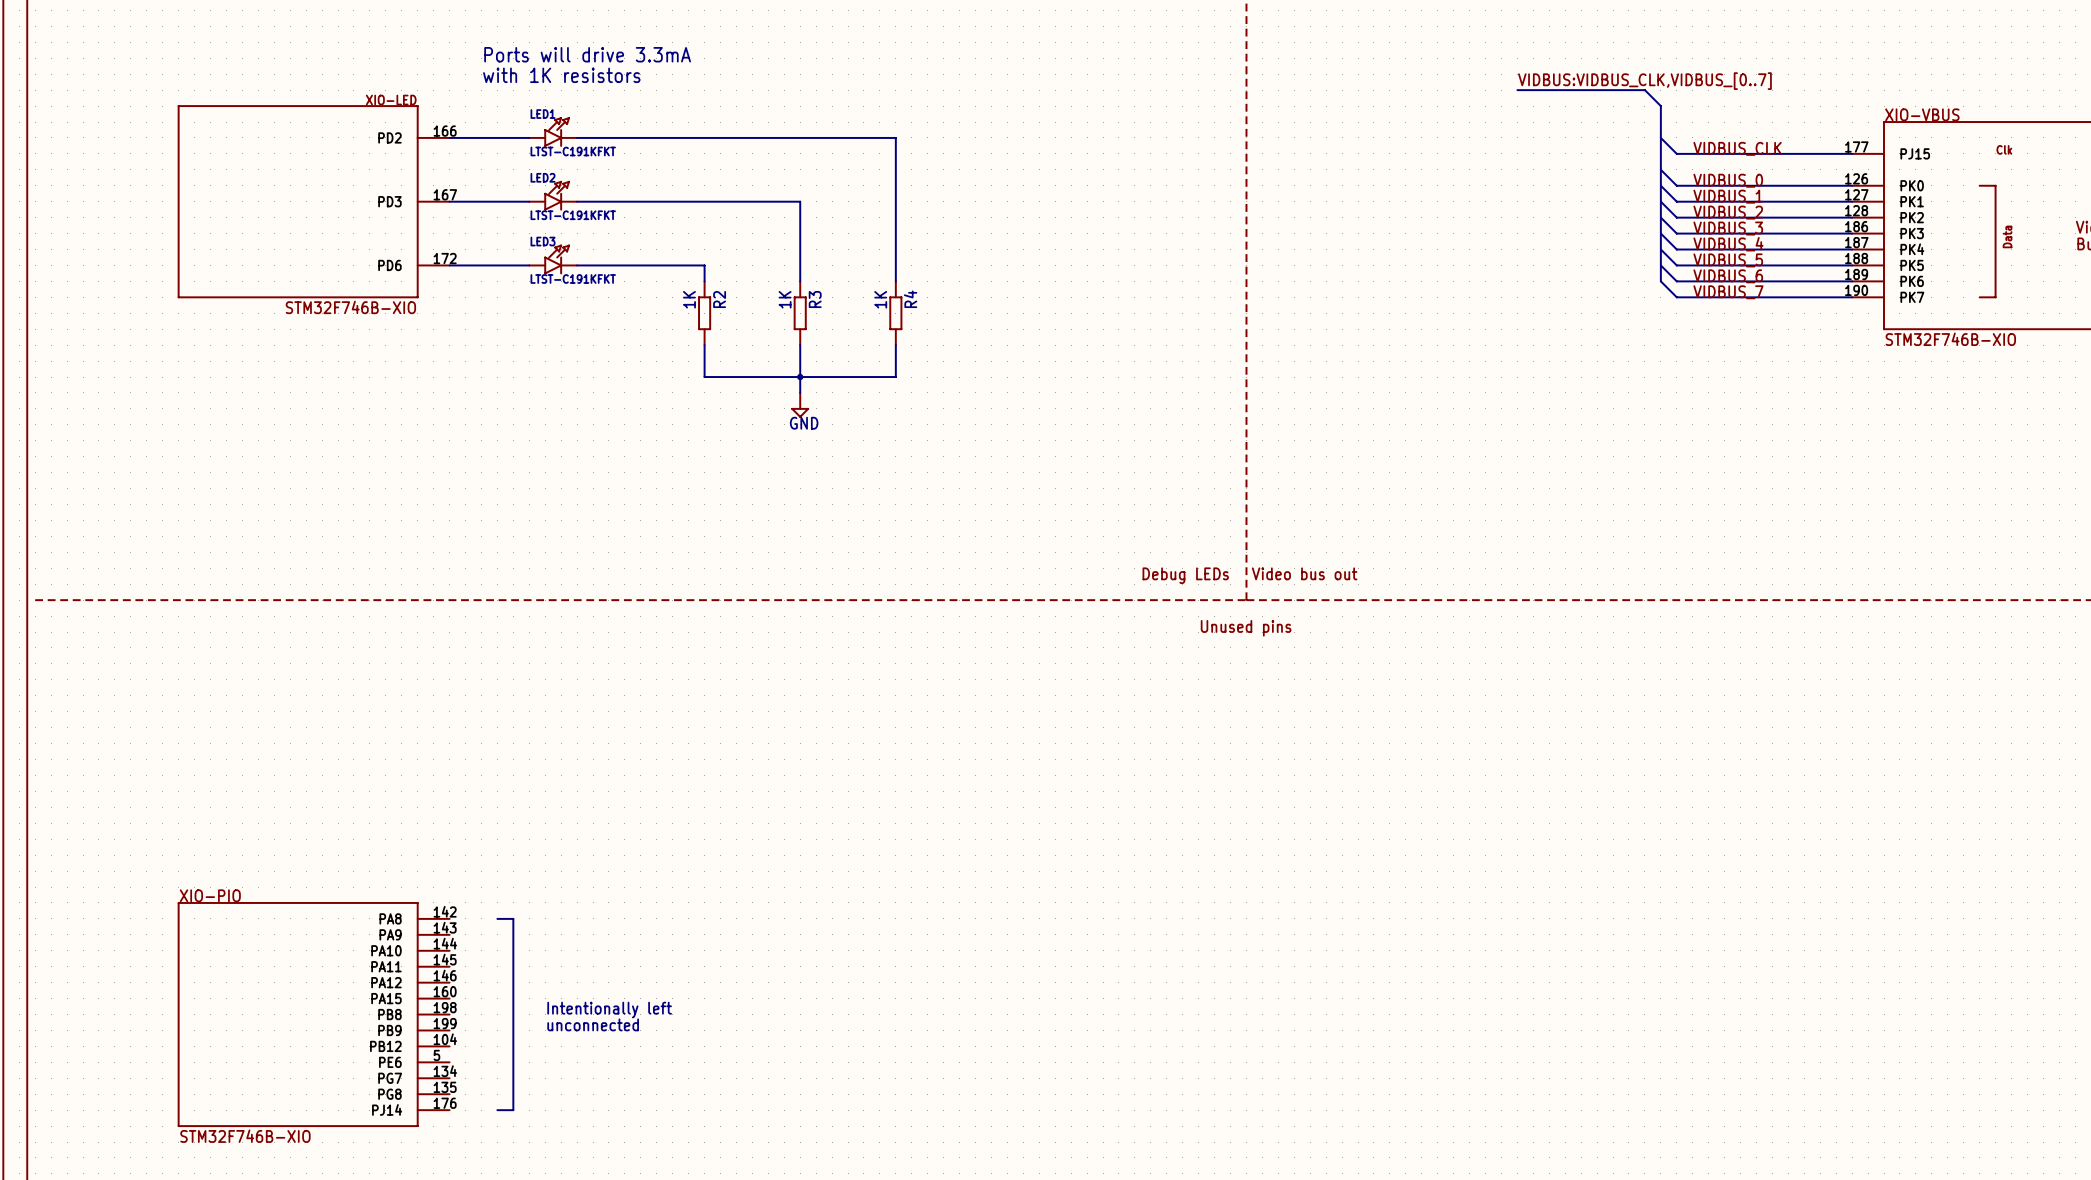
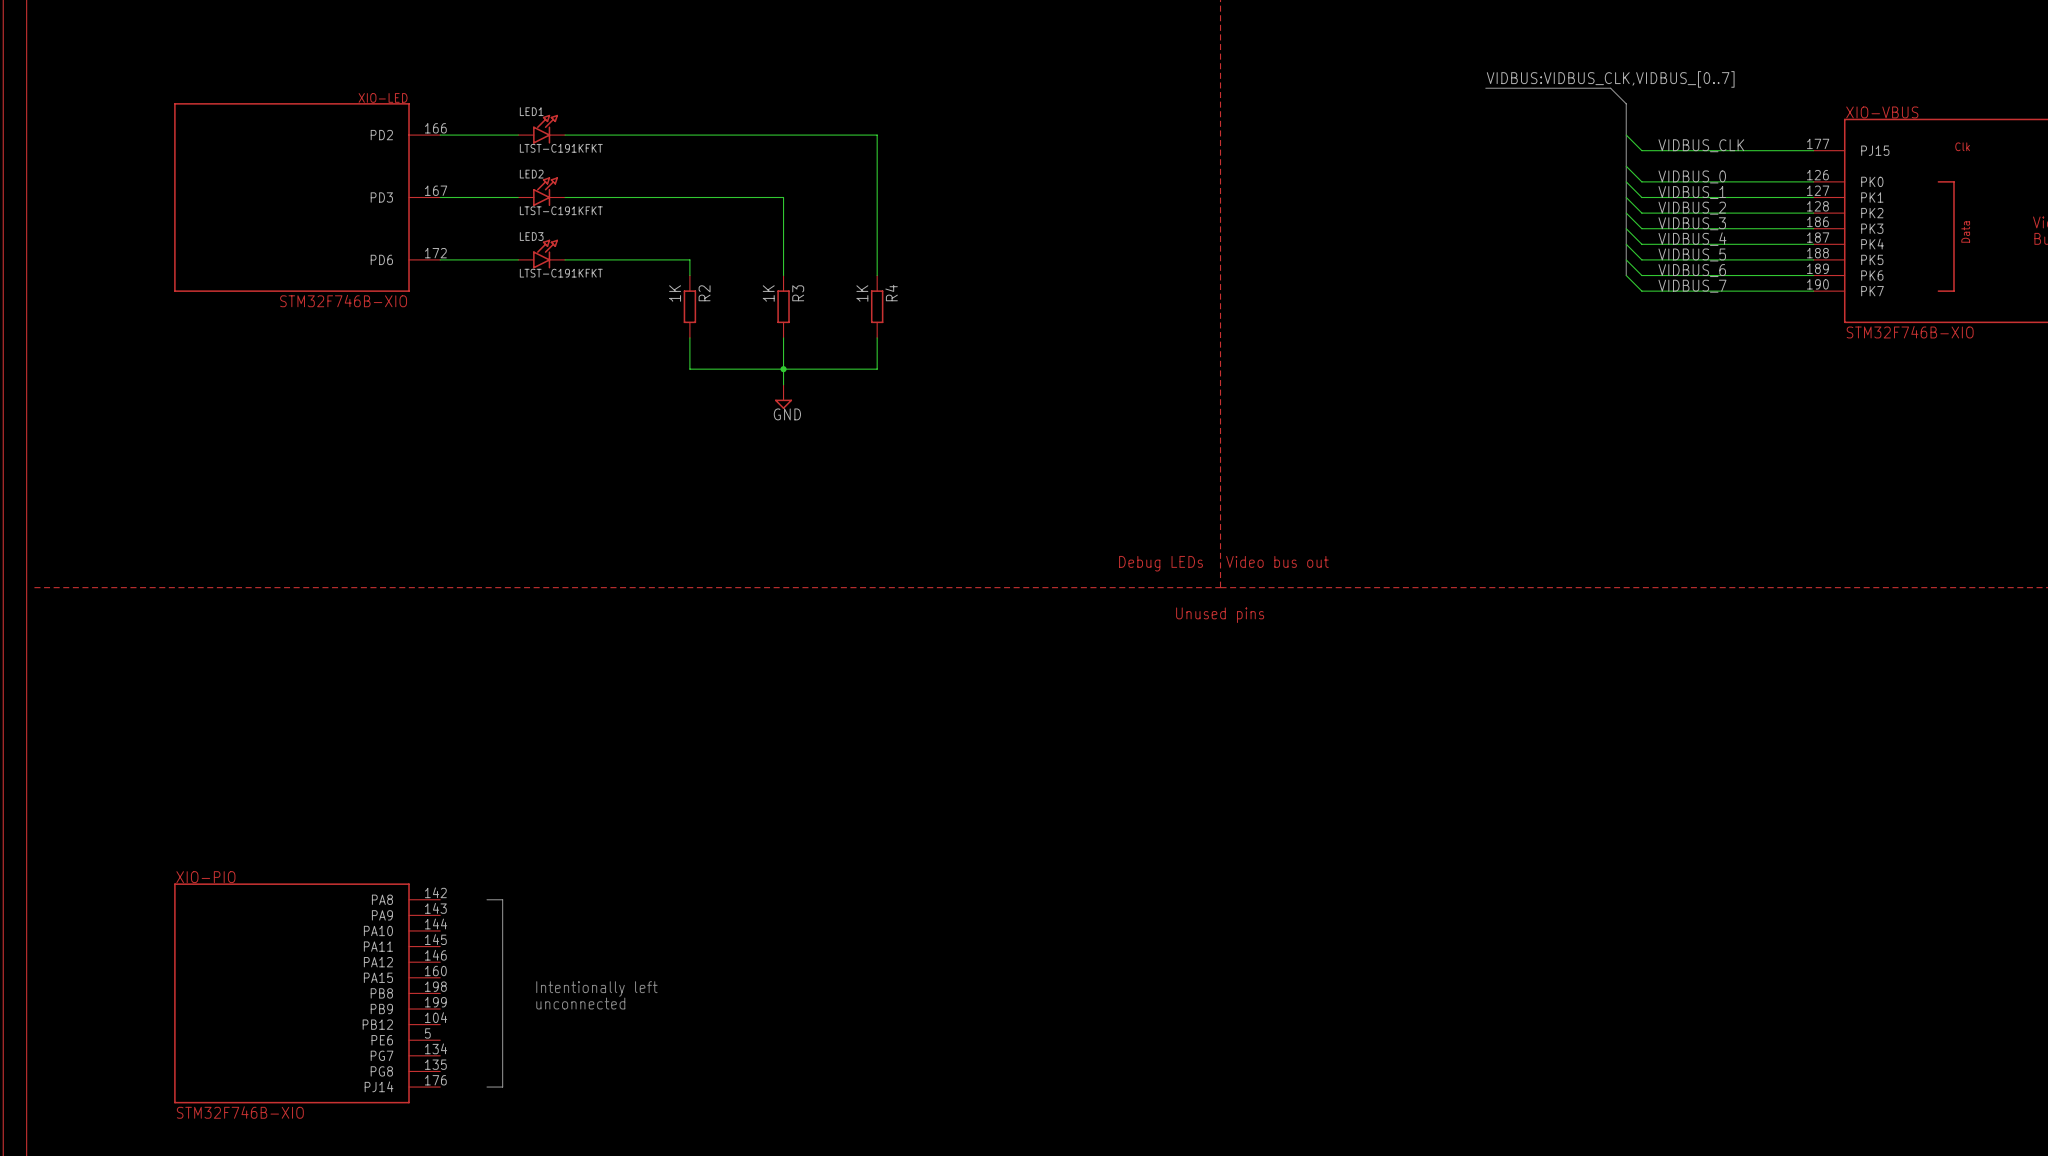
text: Ports will drive 3.3mA (587, 54) -> none
text: with 1K resistors (561, 75) -> none

